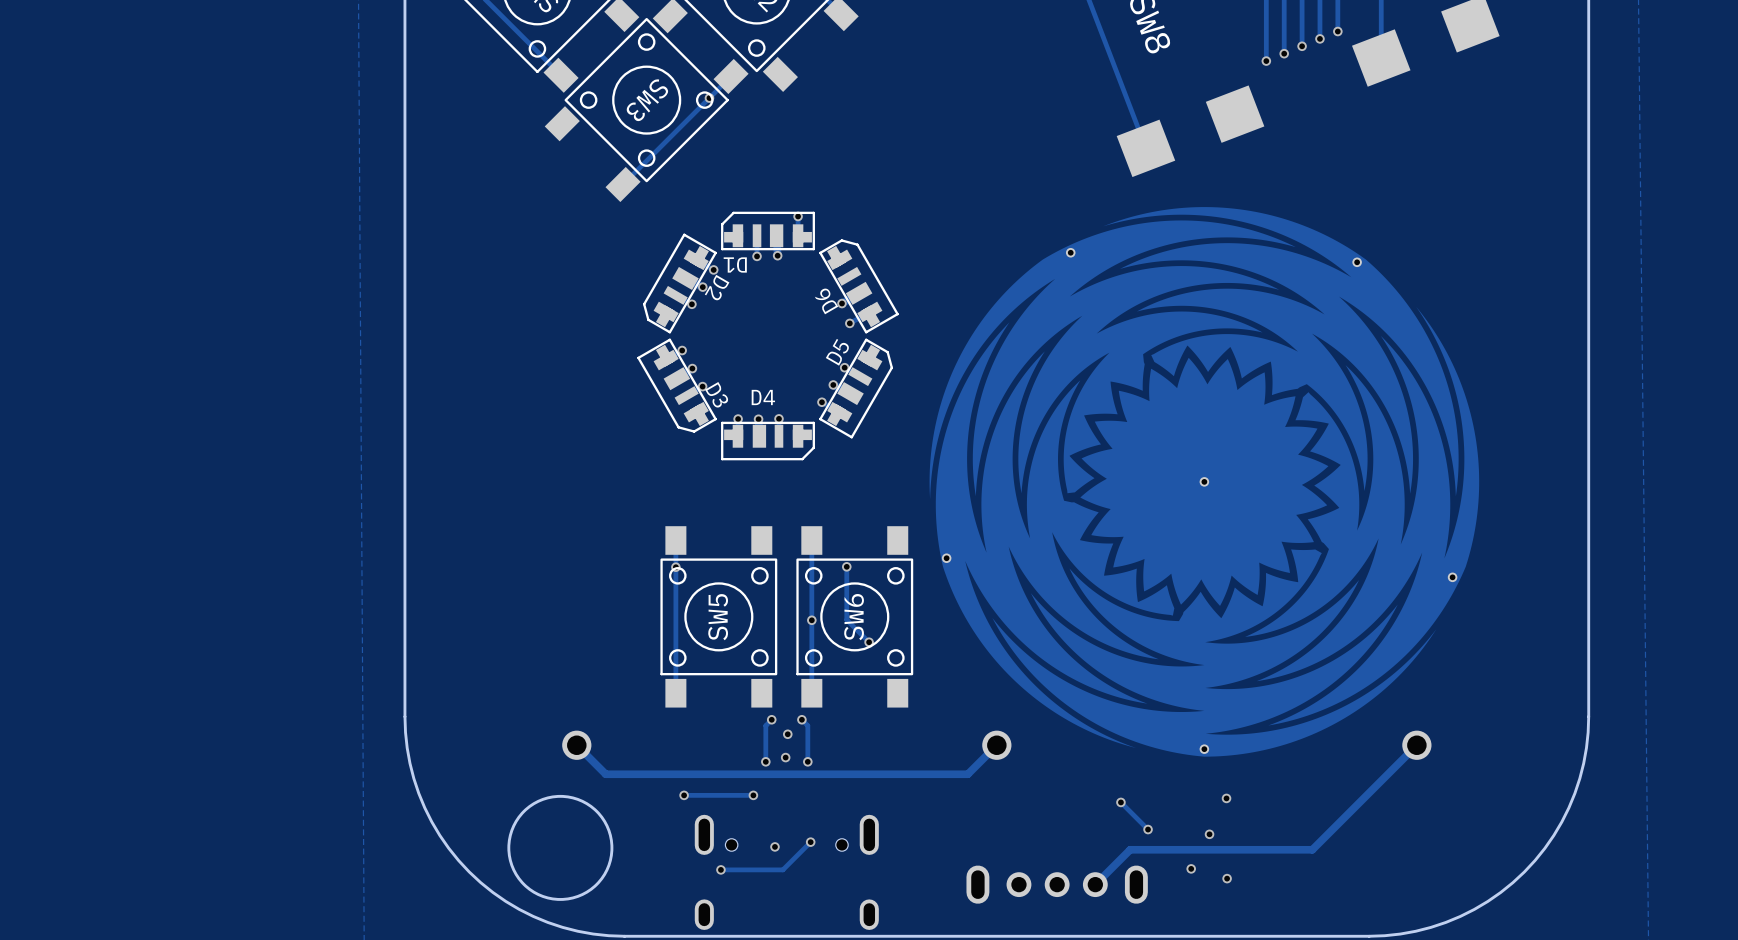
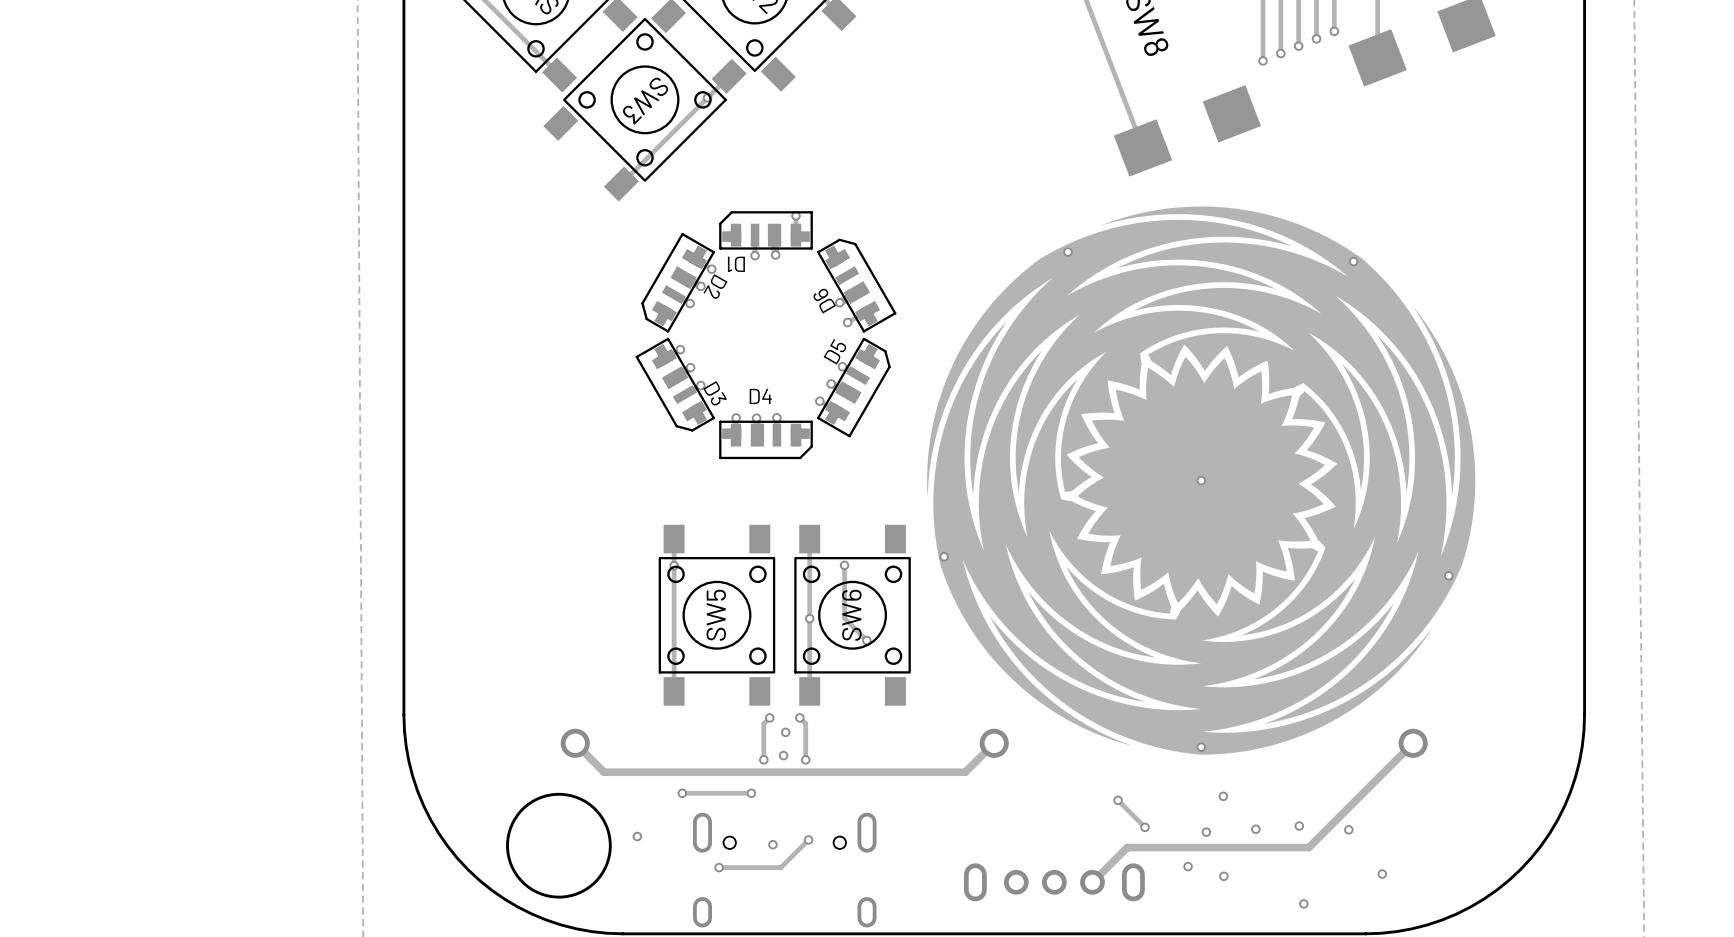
via: none -> (1299, 826)
via: none -> (1255, 829)
via: none -> (1348, 829)
via: none -> (637, 836)
via: none -> (1382, 874)
via: none -> (1303, 903)

